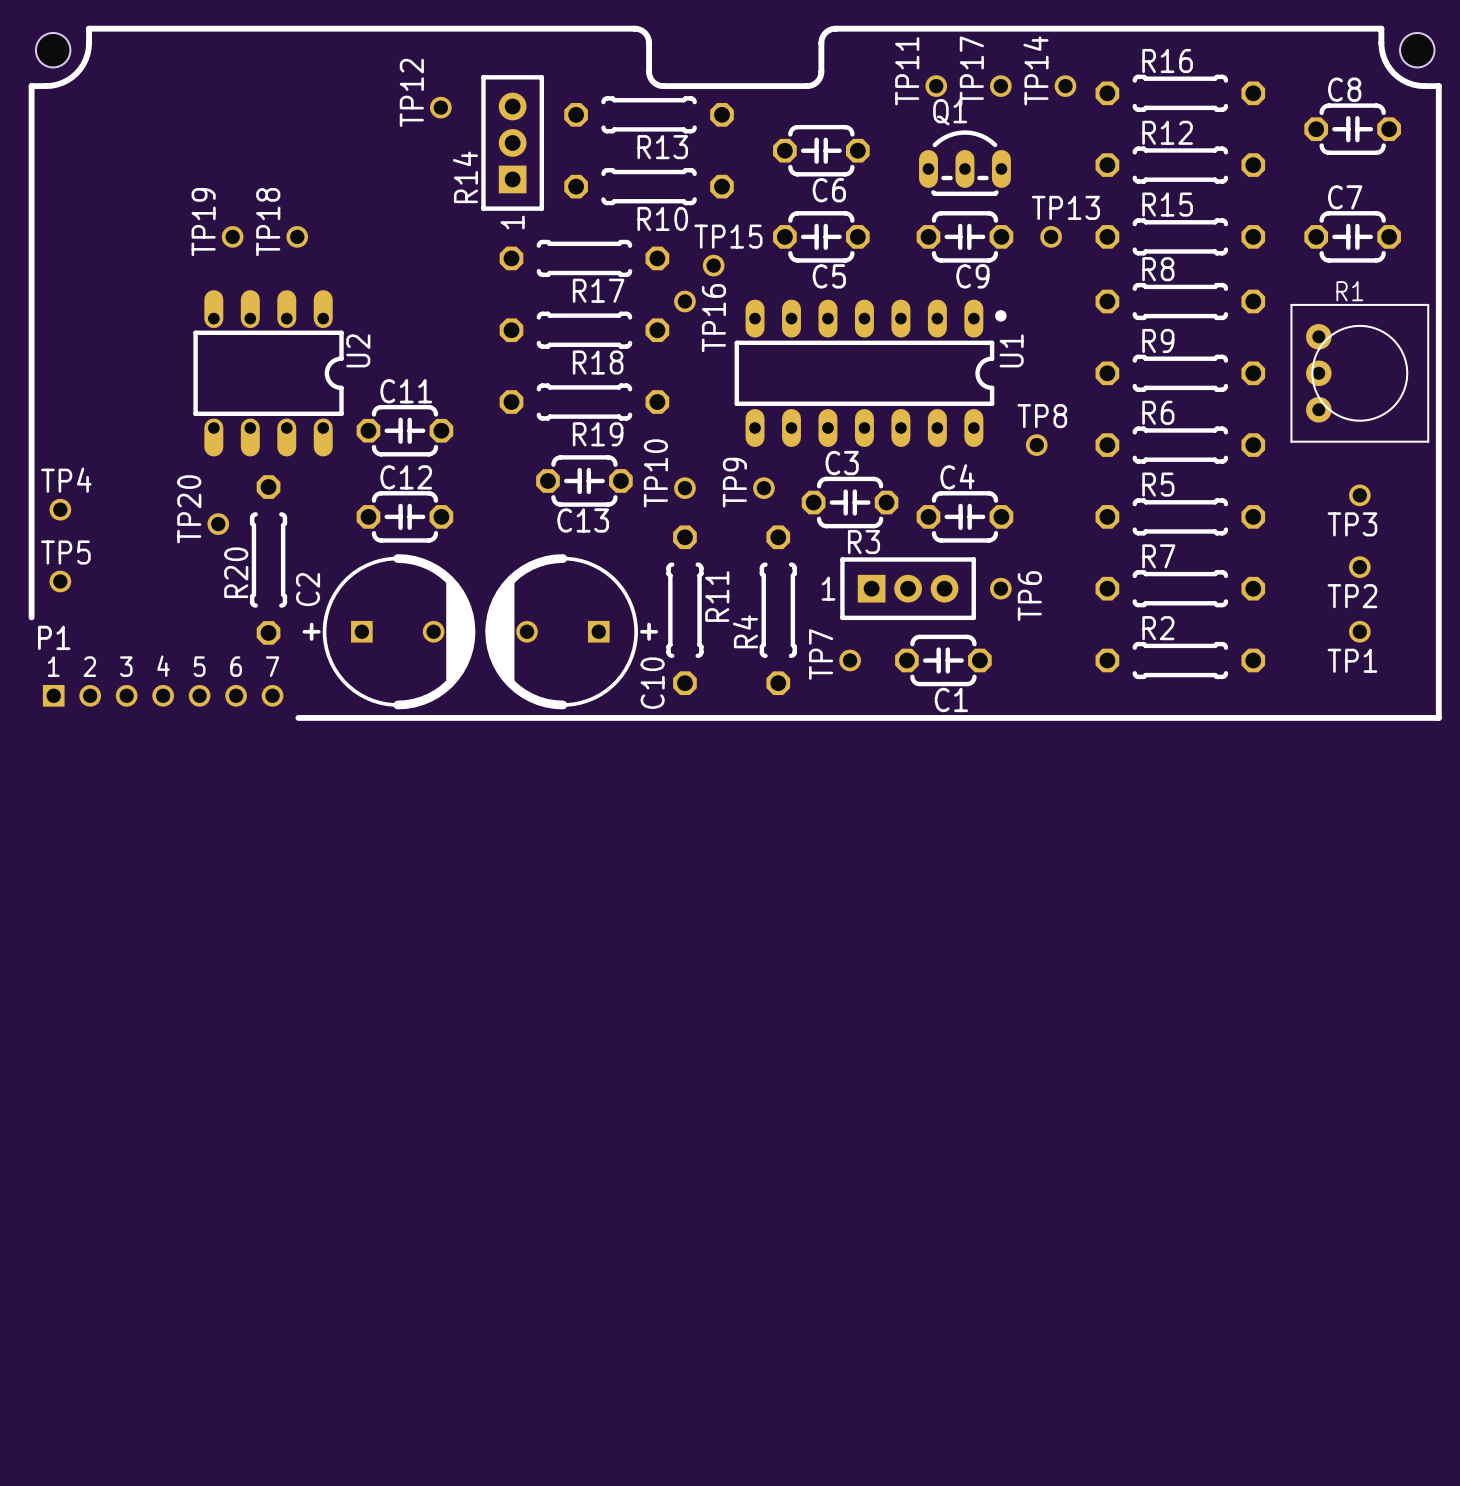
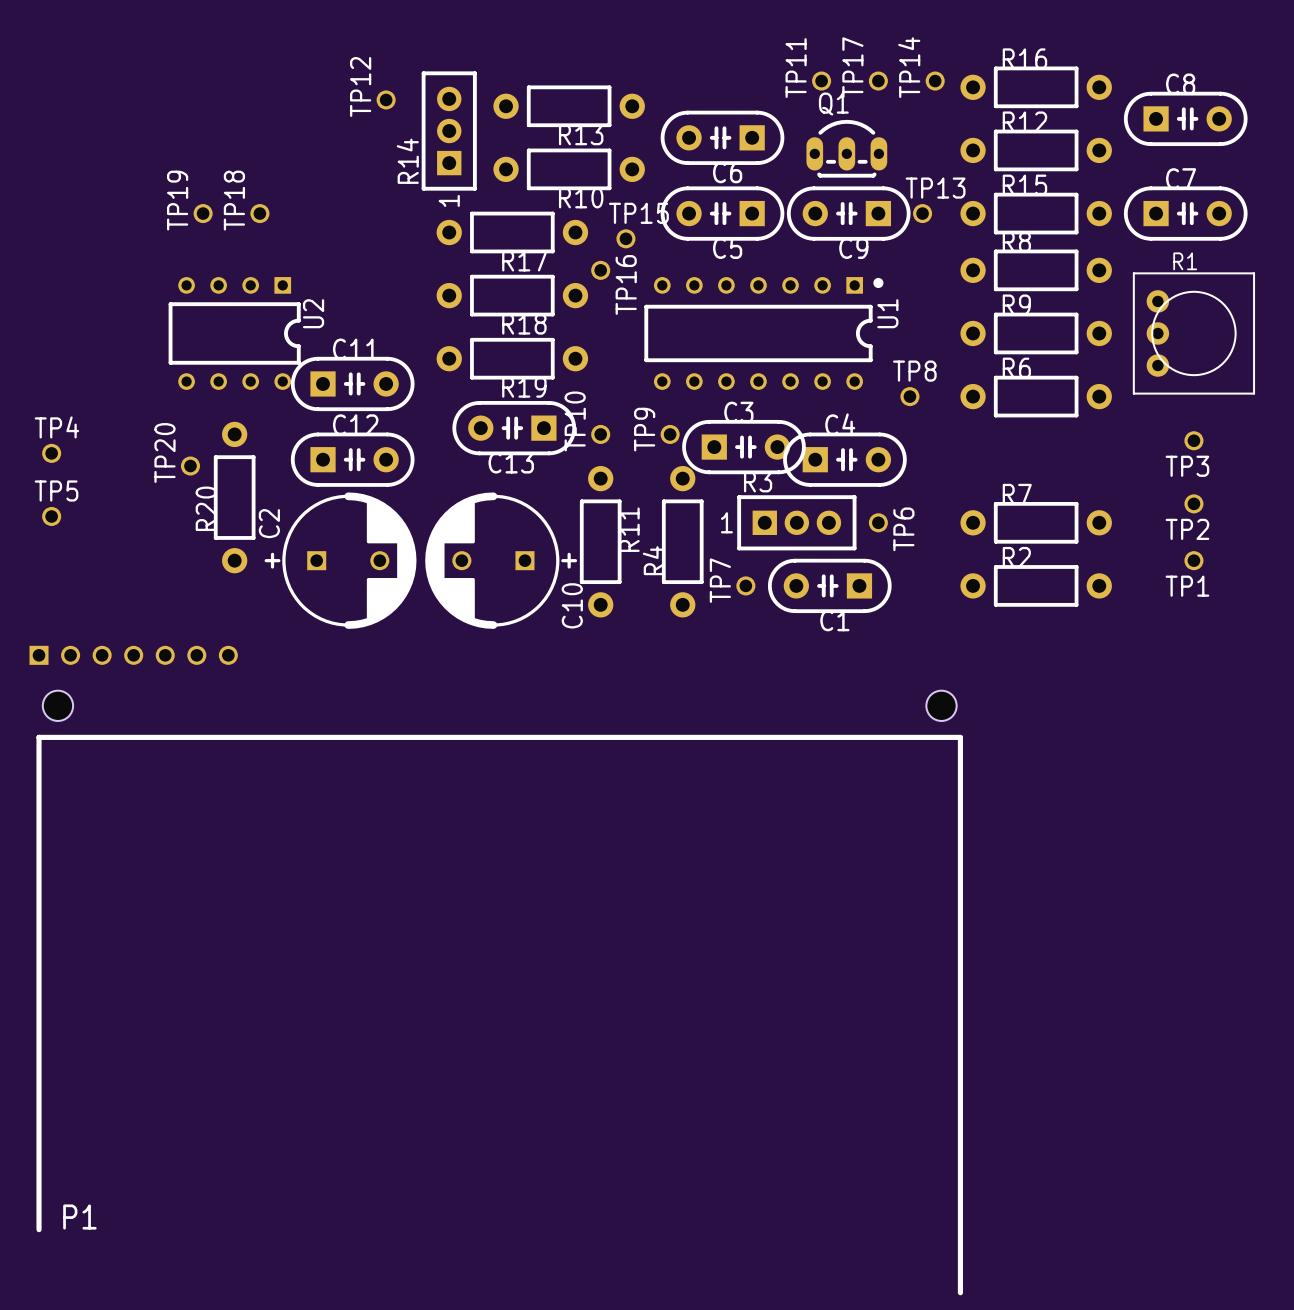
R16 footprint: [1095, 74, 1266, 112] -> [960, 66, 1112, 109]
R13 footprint: [564, 96, 734, 134] -> [493, 85, 645, 128]
C8 footprint: [1304, 103, 1401, 155] -> [1123, 91, 1248, 147]
C6 footprint: [773, 124, 870, 177] -> [660, 110, 785, 165]
R12 footprint: [1095, 146, 1266, 184] -> [960, 129, 1112, 172]
R10 footprint: [564, 168, 734, 206] -> [493, 148, 645, 191]
C5 footprint: [773, 211, 870, 263] -> [660, 186, 785, 241]
C9 footprint: [916, 211, 1014, 263] -> [786, 186, 911, 241]
C7 footprint: [1304, 211, 1401, 263] -> [1123, 186, 1248, 241]
R15 footprint: [1095, 218, 1266, 256] -> [960, 192, 1112, 235]
R17 footprint: [499, 239, 670, 278] -> [436, 211, 589, 254]
R8 footprint: [1095, 282, 1266, 321] -> [960, 249, 1112, 292]
U2 footprint: [193, 290, 344, 457] -> [168, 277, 301, 390]
U1 footprint: [734, 299, 1007, 447] -> [644, 277, 884, 390]
R18 footprint: [499, 311, 670, 349] -> [436, 274, 589, 317]
R9 footprint: [1095, 354, 1266, 392] -> [960, 312, 1112, 355]
part: (735, 373) -> none
R19 footprint: [499, 383, 670, 421] -> [436, 337, 589, 380]
C11 footprint: [356, 404, 454, 457] -> [290, 356, 415, 412]
R6 footprint: [1095, 426, 1266, 464] -> [960, 375, 1112, 418]
C13 footprint: [536, 455, 633, 507] -> [452, 401, 577, 456]
R20 footprint: [249, 475, 288, 645] -> [213, 421, 256, 574]
C3 footprint: [801, 476, 899, 529] -> [682, 419, 806, 475]
C12 footprint: [356, 491, 454, 543] -> [290, 432, 415, 487]
C4 footprint: [916, 491, 1014, 543] -> [783, 432, 907, 487]
R5: (1180, 516) -> none
R11 footprint: [666, 525, 704, 696] -> [579, 466, 622, 618]
R4 footprint: [759, 525, 797, 696] -> [661, 466, 704, 618]
C2 footprint: [302, 554, 476, 710] -> [264, 492, 417, 629]
C10 footprint: [485, 554, 659, 710] -> [425, 492, 578, 629]
R7 footprint: [1095, 570, 1266, 608] -> [960, 501, 1112, 544]
C1 footprint: [895, 634, 992, 687] -> [767, 558, 892, 614]
R2 footprint: [1095, 641, 1266, 680] -> [960, 565, 1112, 607]
part: none -> (133, 655)
part: none -> (499, 993)

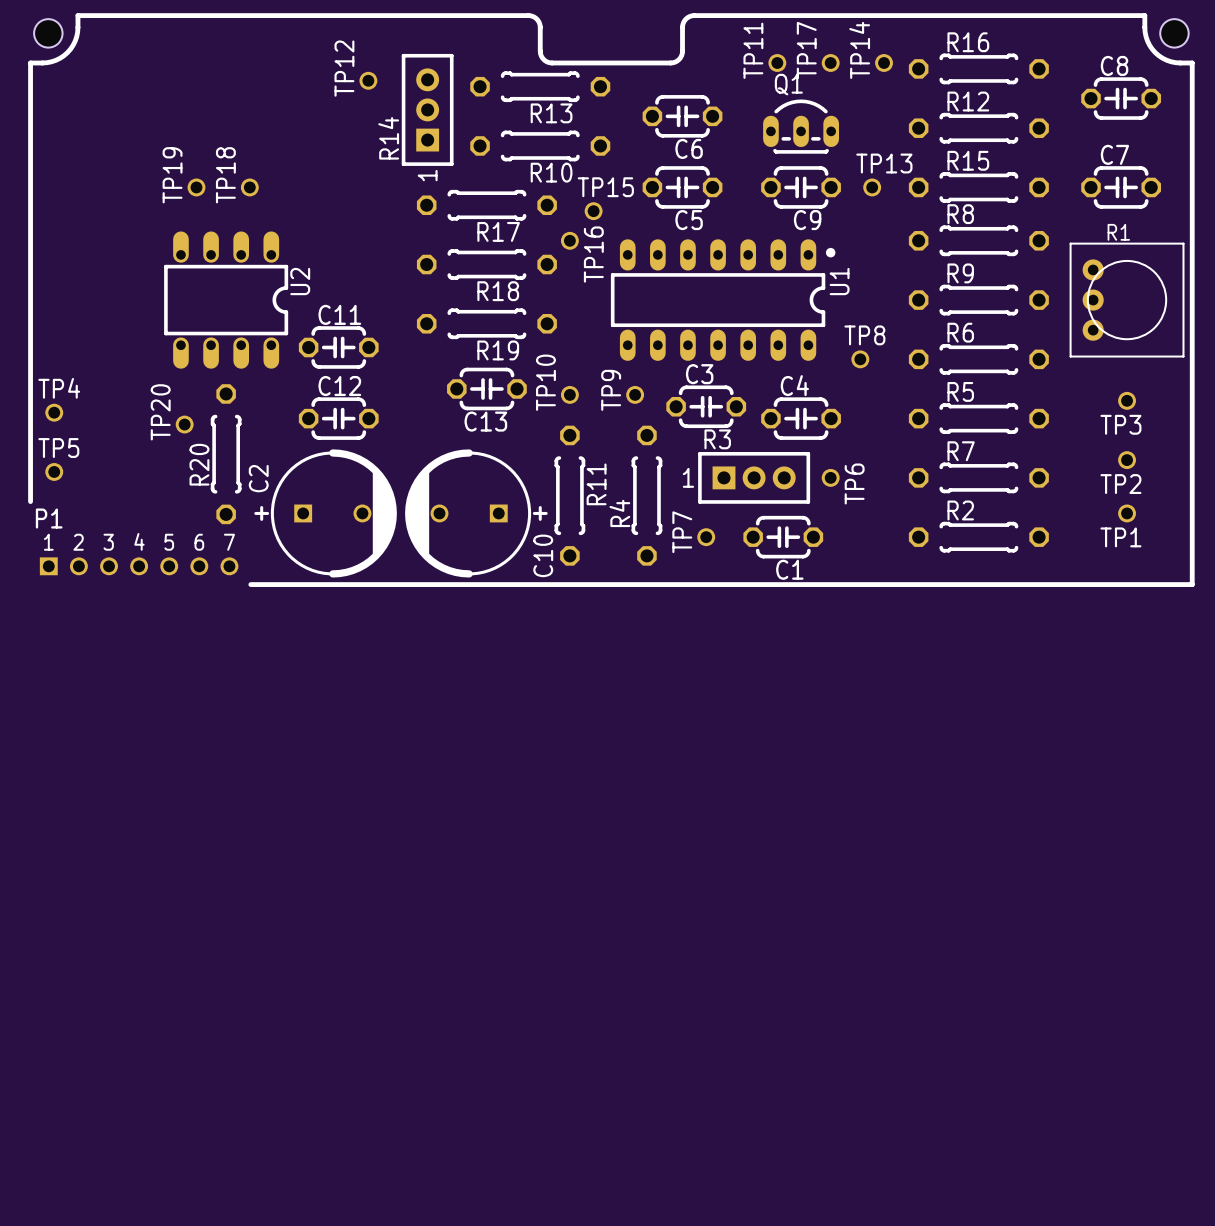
R16 footprint: [960, 66, 1112, 109] -> [908, 53, 1049, 85]
R13 footprint: [493, 85, 645, 128] -> [470, 71, 611, 103]
C8 footprint: [1123, 91, 1248, 147] -> [1081, 77, 1162, 120]
C6 footprint: [660, 110, 785, 165] -> [642, 95, 723, 138]
R12 footprint: [960, 129, 1112, 172] -> [908, 112, 1049, 144]
R10 footprint: [493, 148, 645, 191] -> [470, 130, 611, 162]
C5 footprint: [660, 186, 785, 241] -> [642, 166, 723, 209]
C9 footprint: [786, 186, 911, 241] -> [761, 166, 841, 209]
C7 footprint: [1123, 186, 1248, 241] -> [1081, 166, 1162, 209]
R15 footprint: [960, 192, 1112, 235] -> [908, 172, 1049, 203]
R17 footprint: [436, 211, 589, 254] -> [416, 189, 557, 221]
R8 footprint: [960, 249, 1112, 292] -> [908, 225, 1049, 257]
R18 footprint: [436, 274, 589, 317] -> [416, 249, 557, 280]
U2 footprint: [168, 277, 301, 390] -> [164, 231, 289, 369]
U1 footprint: [644, 277, 884, 390] -> [610, 239, 836, 361]
R9 footprint: [960, 312, 1112, 355] -> [908, 284, 1049, 316]
part: none -> (611, 300)
R19 footprint: [436, 337, 589, 380] -> [416, 308, 557, 340]
C11 footprint: [290, 356, 415, 412] -> [298, 326, 379, 369]
R6 footprint: [960, 375, 1112, 418] -> [908, 343, 1049, 375]
C13 footprint: [452, 401, 577, 456] -> [447, 367, 527, 411]
C3 footprint: [682, 419, 806, 475] -> [666, 385, 747, 429]
R20 footprint: [213, 421, 256, 574] -> [210, 384, 242, 525]
C12 footprint: [290, 432, 415, 487] -> [298, 397, 379, 440]
C4 footprint: [783, 432, 907, 487] -> [761, 397, 841, 440]
R5: none -> (978, 418)
R11 footprint: [579, 466, 622, 618] -> [554, 425, 586, 566]
R4 footprint: [661, 466, 704, 618] -> [631, 425, 663, 566]
C2 footprint: [264, 492, 417, 629] -> [254, 449, 397, 578]
C10 footprint: [425, 492, 578, 629] -> [405, 449, 548, 578]
R7 footprint: [960, 501, 1112, 544] -> [908, 462, 1049, 494]
C1 footprint: [767, 558, 892, 614] -> [743, 515, 824, 559]
R2 footprint: [960, 565, 1112, 607] -> [908, 521, 1049, 553]
part: (133, 655) -> none
part: (499, 993) -> none

